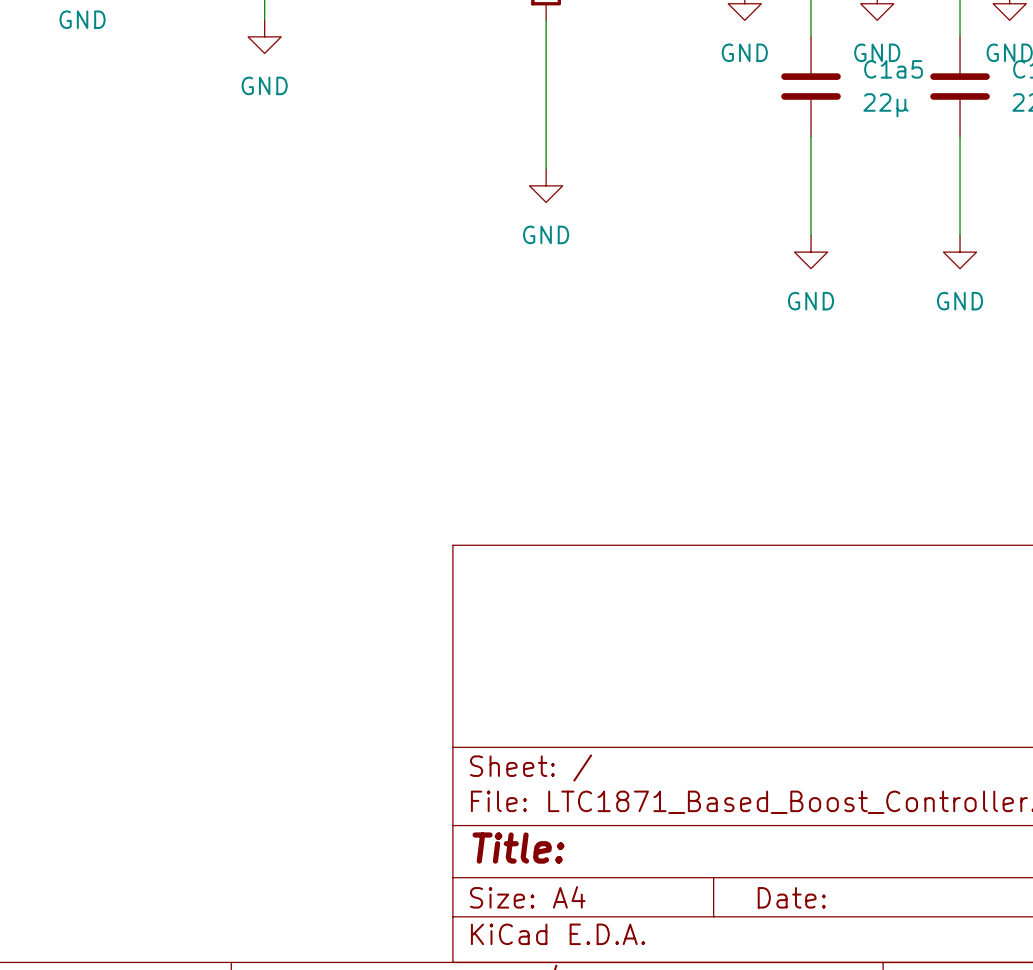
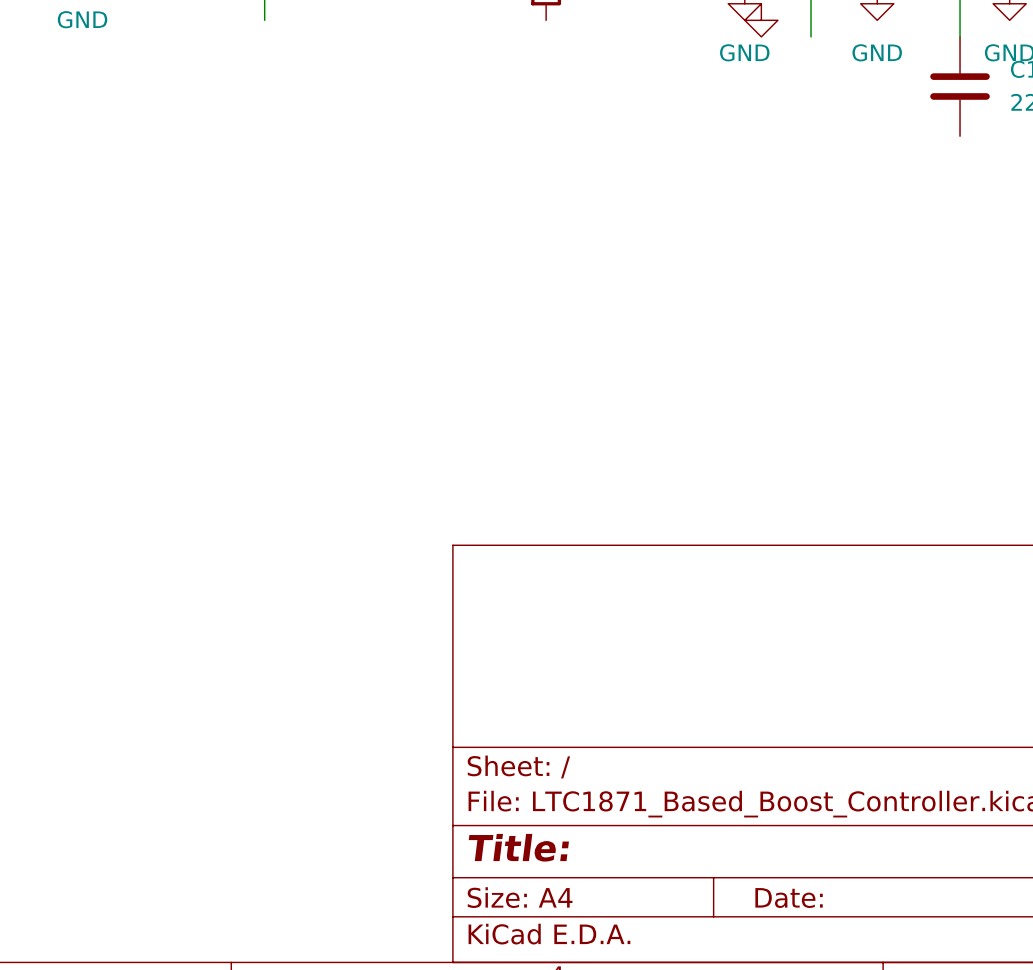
wire: (546, 20) (546, 169) -> none
power symbol: none -> (761, 20)
power symbol: GND (264, 36) -> none
C1a5: 22µ (811, 86) -> none
wire: (811, 136) (811, 235) -> none
wire: (960, 136) (960, 235) -> none
power symbol: GND (546, 185) -> none
power symbol: GND (811, 252) -> none
power symbol: GND (960, 252) -> none

